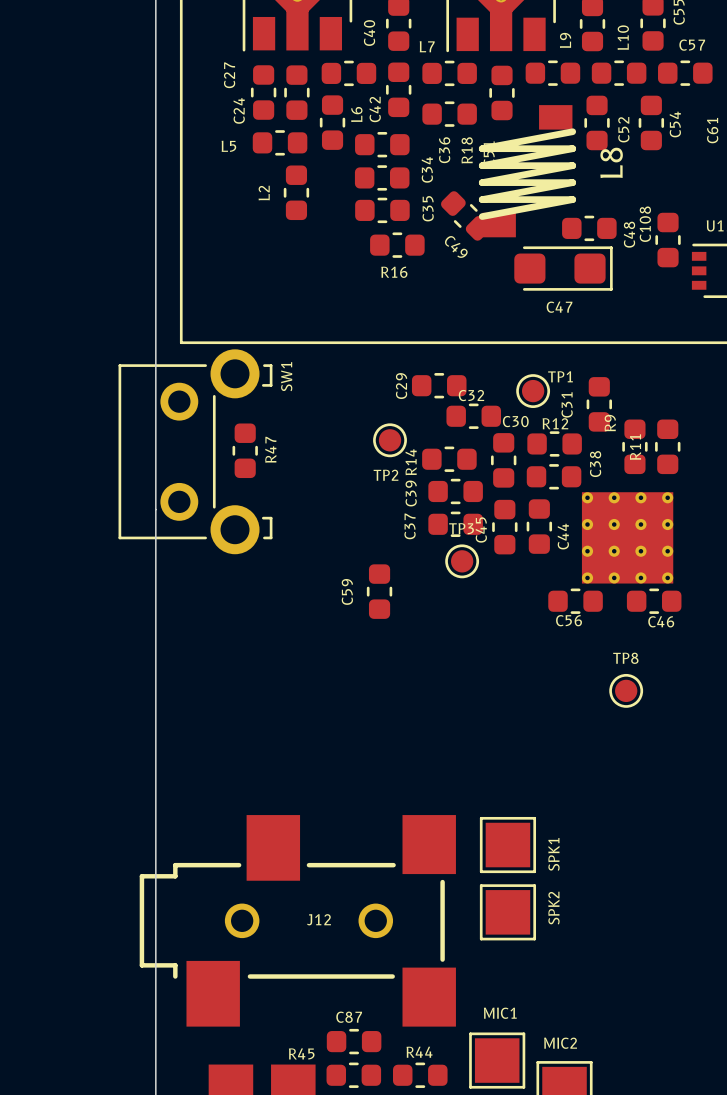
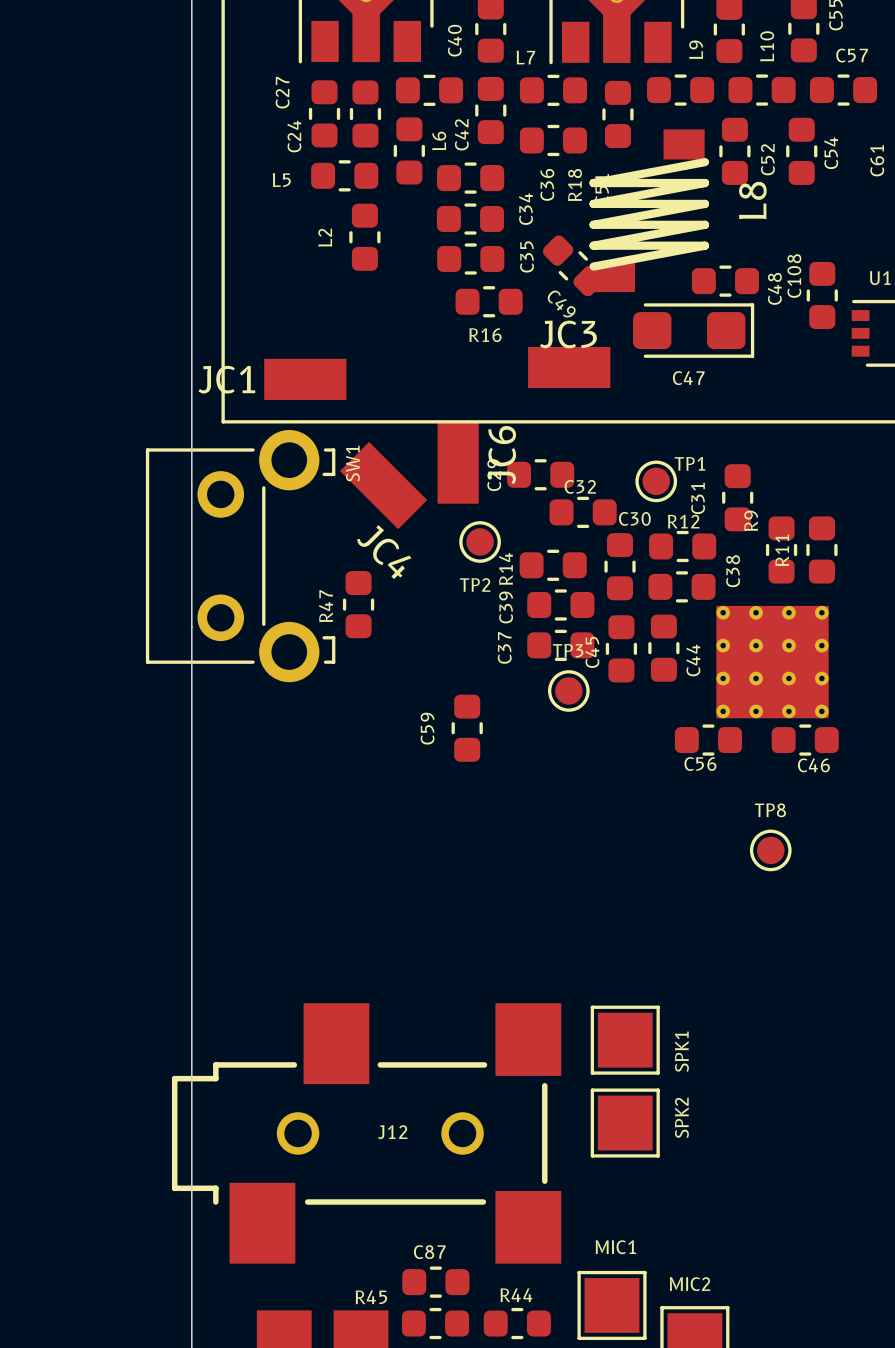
JC3: none -> (569, 367)
JC1: none -> (305, 379)
JC6: none -> (458, 462)
JC4: none -> (383, 485)
R47 name position: R47 (270, 449) -> R47 (326, 606)
R47 position: (245, 450) -> (358, 604)

